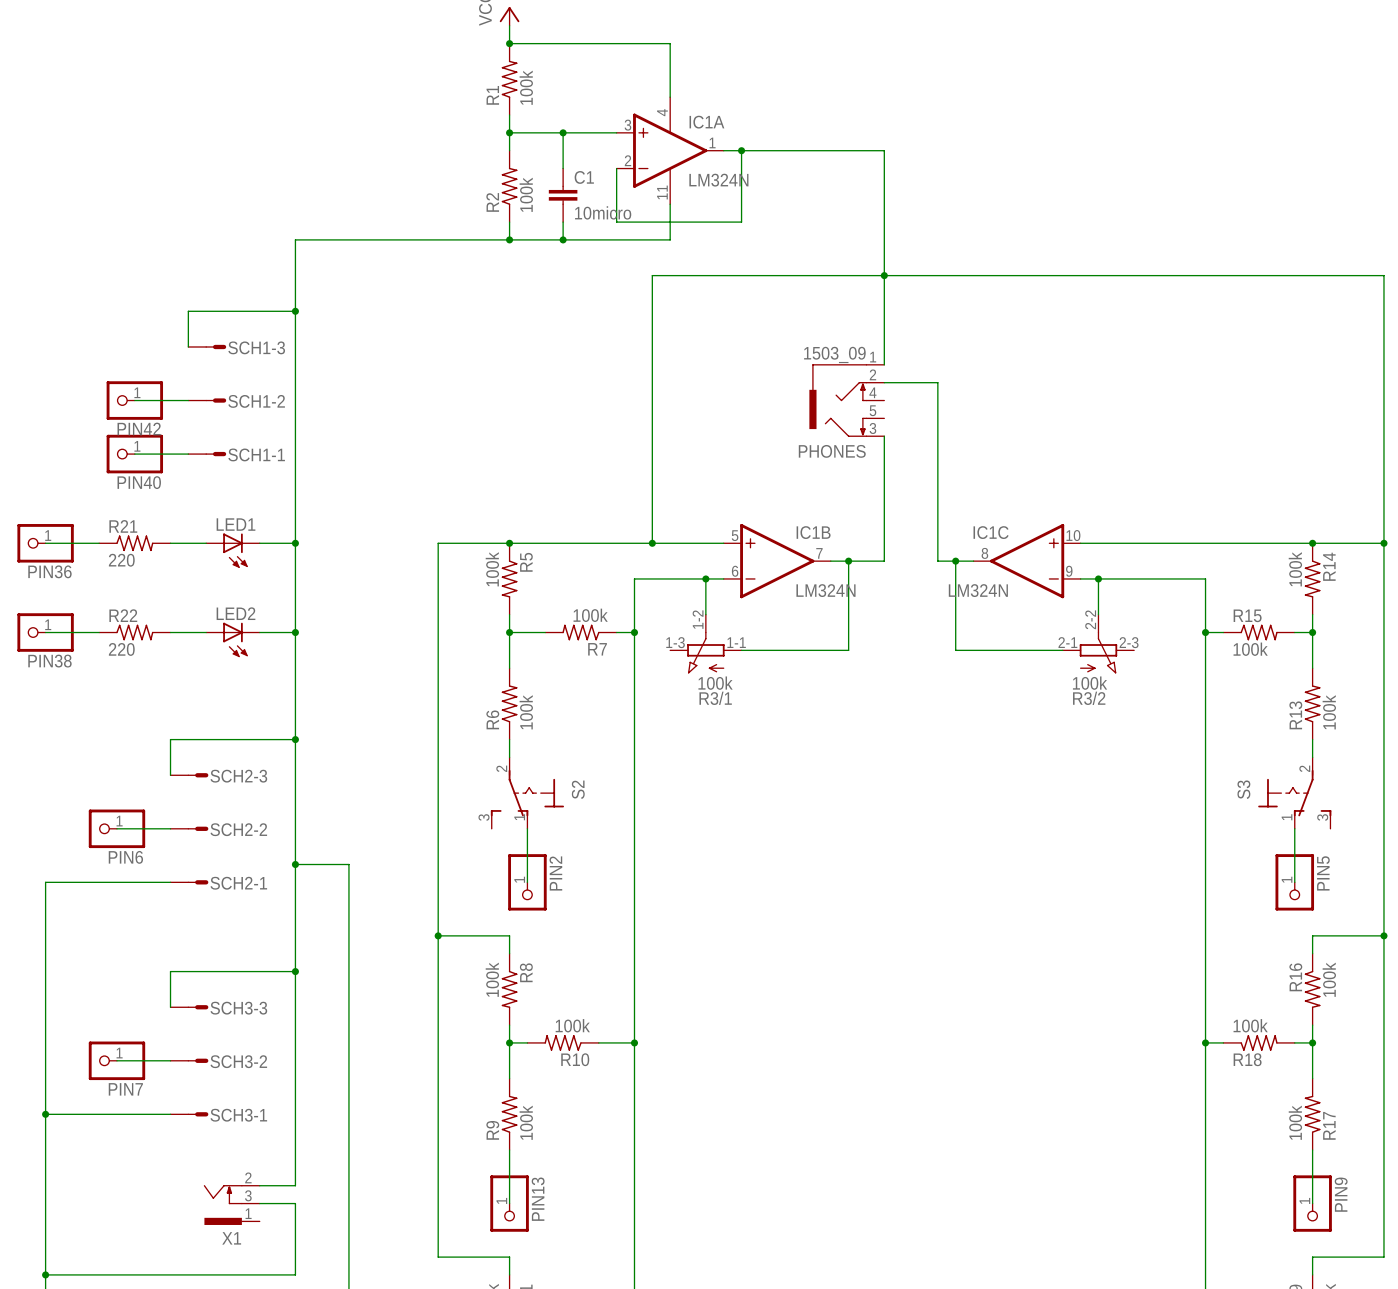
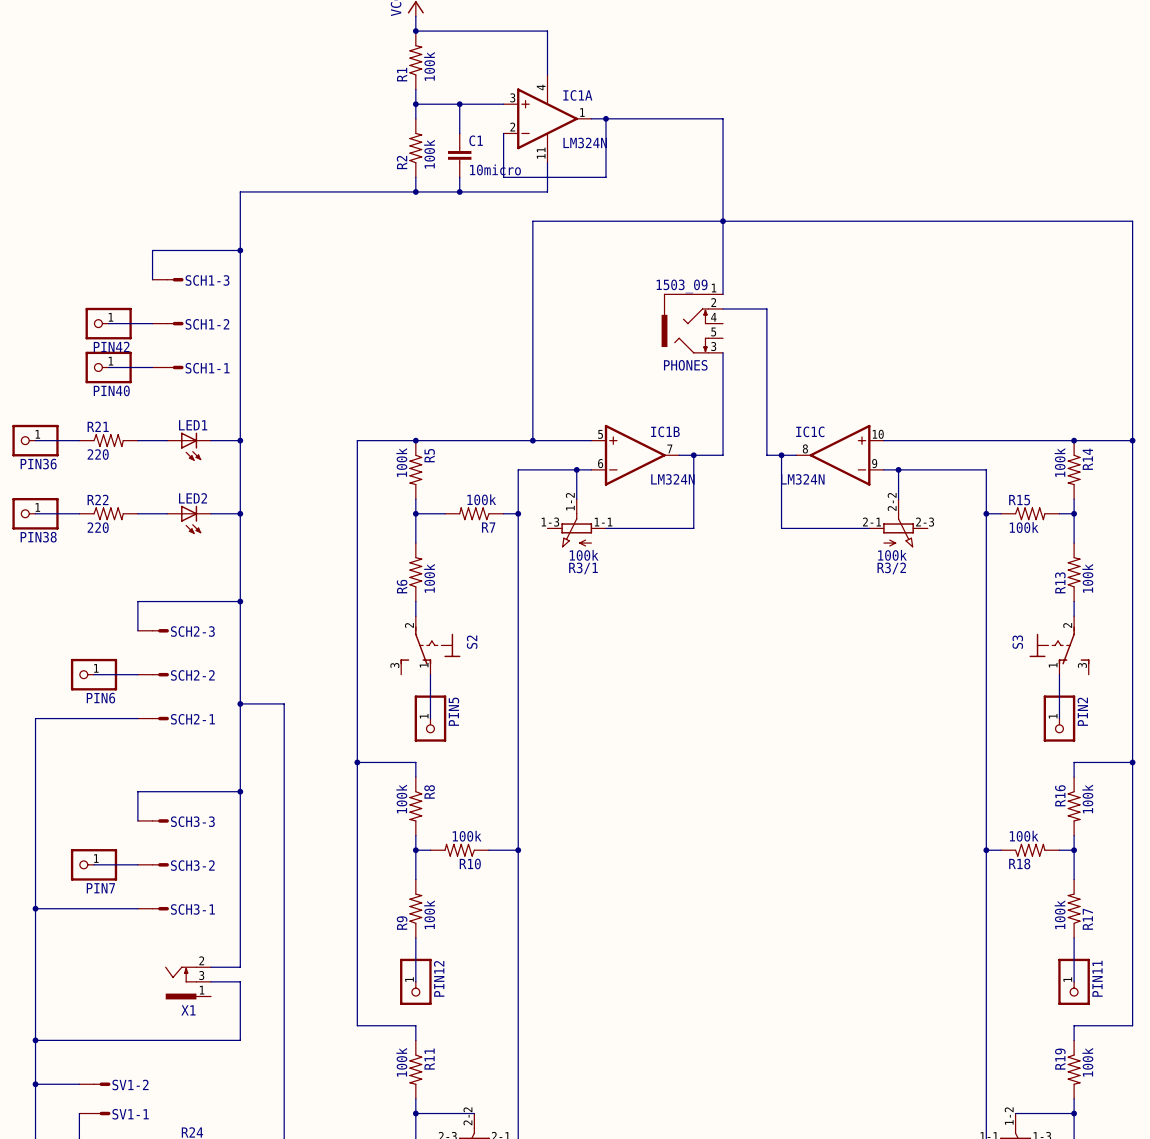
PIN2 name: PIN2 (555, 873) -> PIN5 (453, 711)
PIN5 name: PIN5 (1323, 873) -> PIN2 (1082, 711)
PIN9 name: PIN9 (1341, 1194) -> PIN11 (1097, 978)
PIN13 name: PIN13 (538, 1199) -> PIN12 (439, 978)

